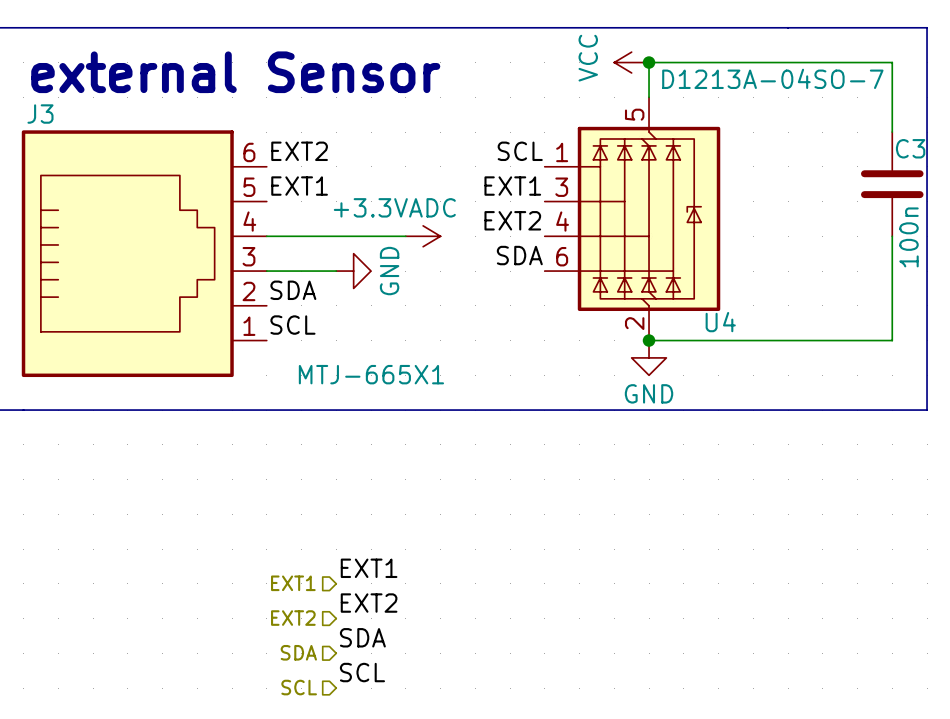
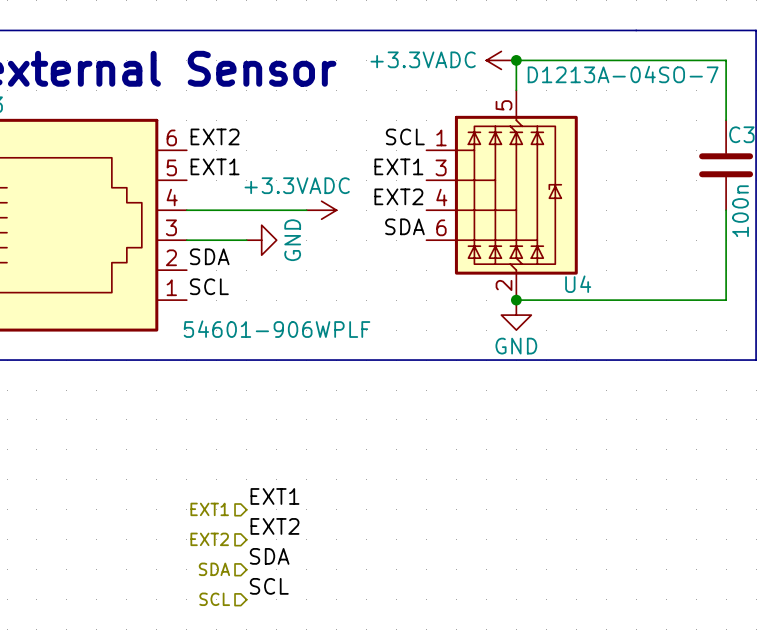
power symbol: VCC (631, 62) -> +3.3VADC (501, 60)
J3 value: MTJ-665X1 (371, 374) -> 54601-906WPLF (277, 329)

